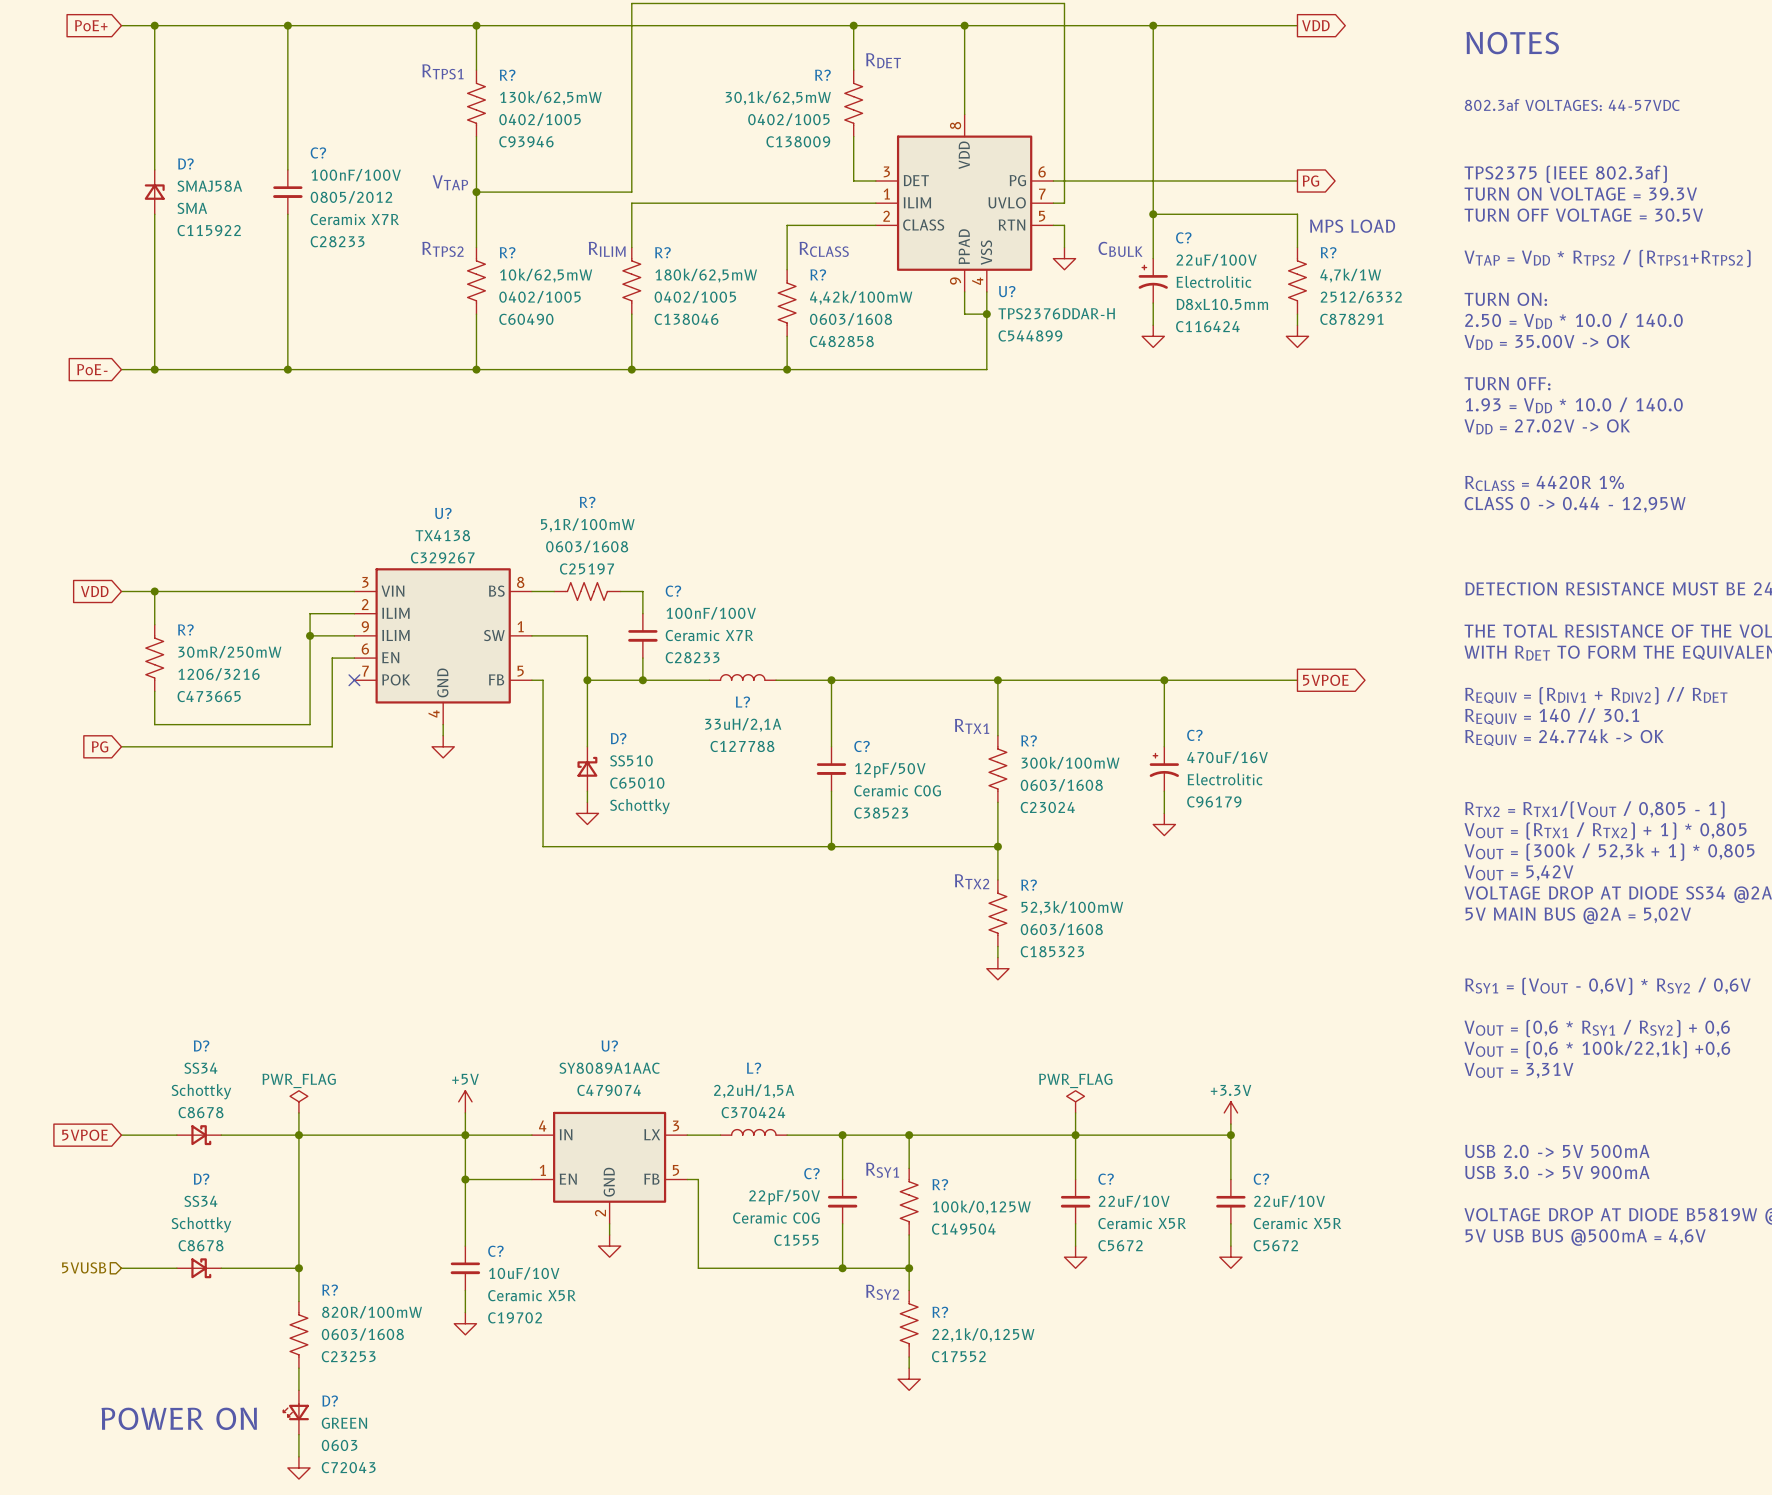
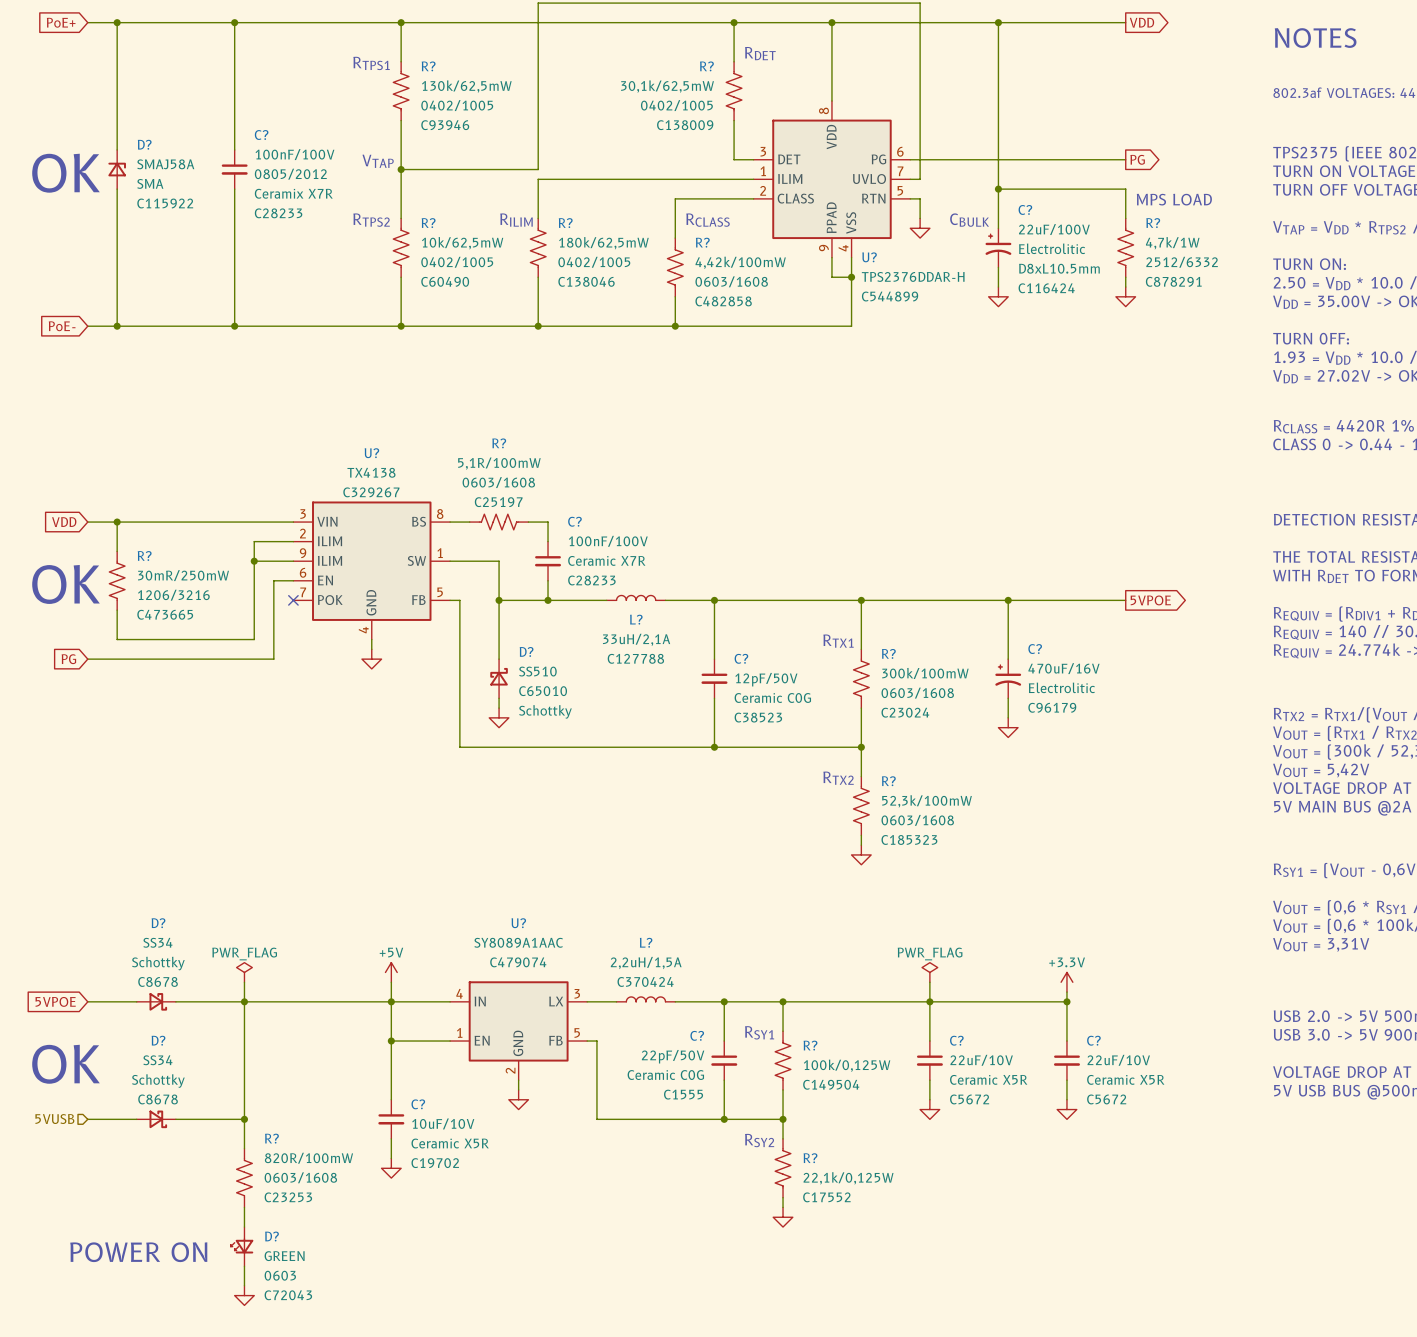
text: none -> OK (65, 173)
text: none -> OK (65, 584)
text: none -> OK (65, 1064)

